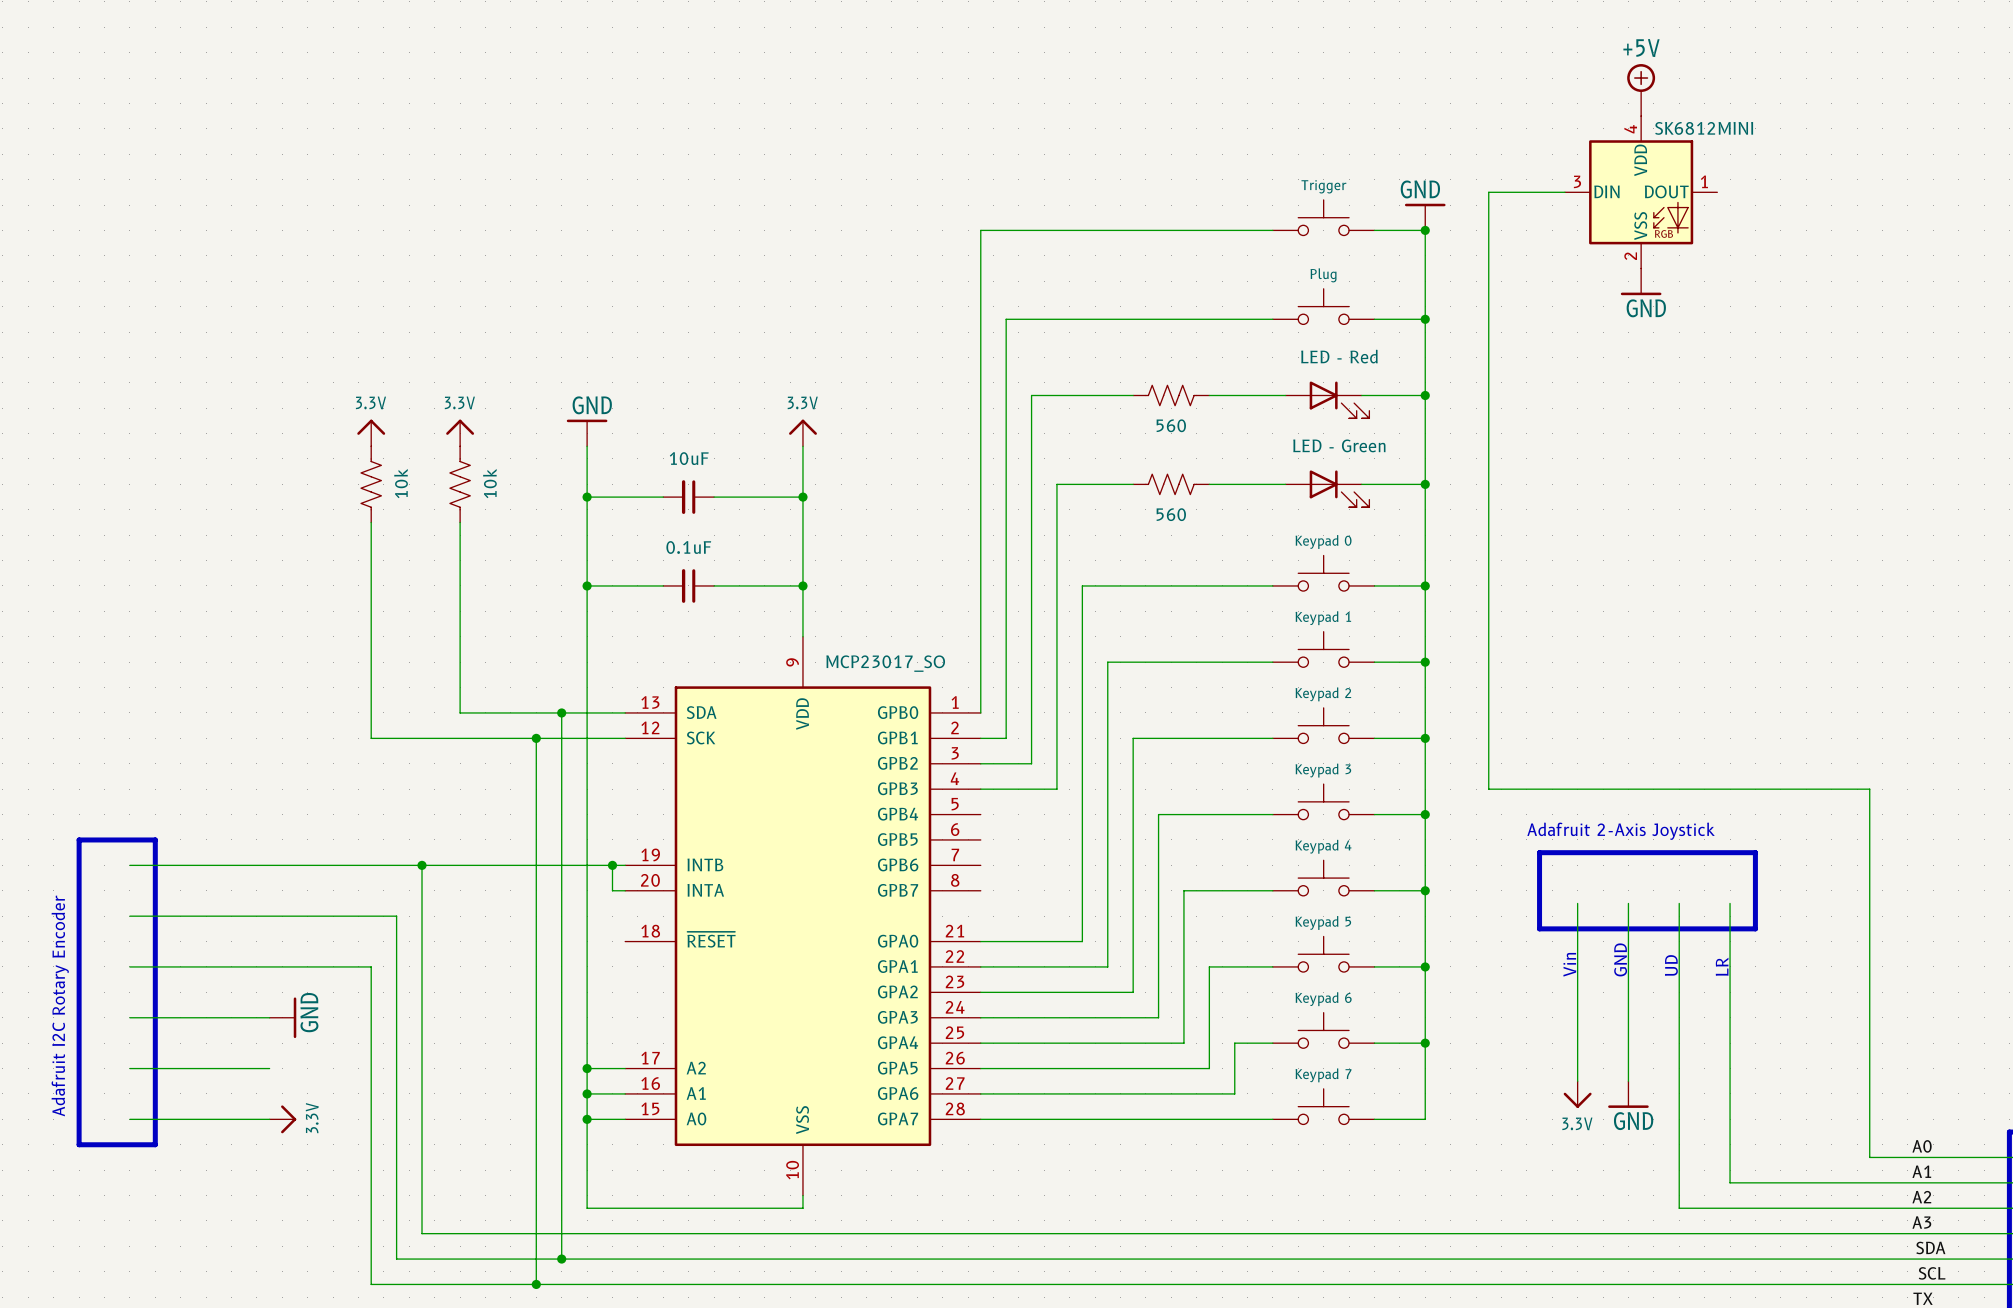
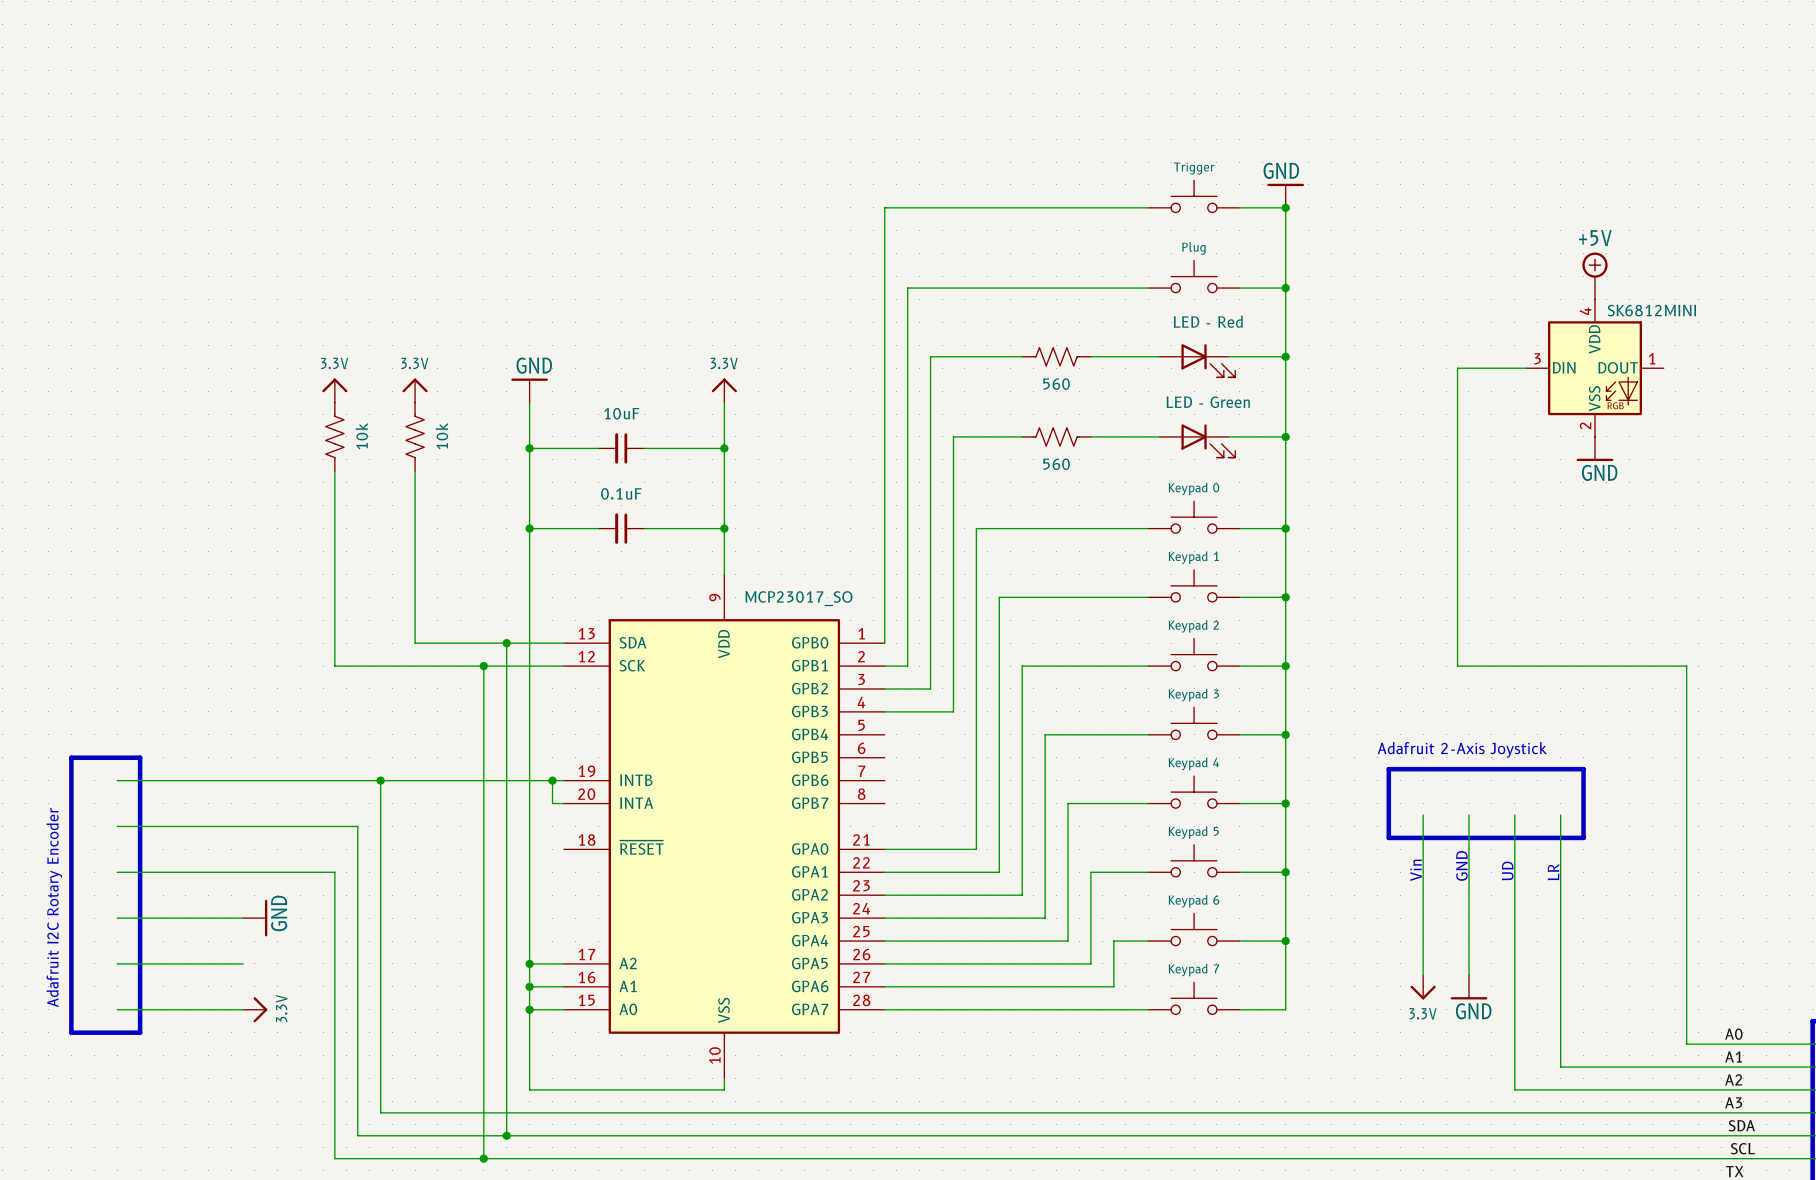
power symbol: +5V (1641, 90) -> none
wire: (1564, 192) (1488, 192) (1488, 789) (1869, 789) -> (1526, 368) (1457, 368) (1457, 666) (1686, 666) (1686, 711)
part: SK6812MINI (1641, 192) -> none
power symbol: GND (1641, 281) -> none
power symbol: none -> +5V (1595, 276)
part: none -> SK6812MINI (1595, 368)
power symbol: none -> GND (1595, 448)

